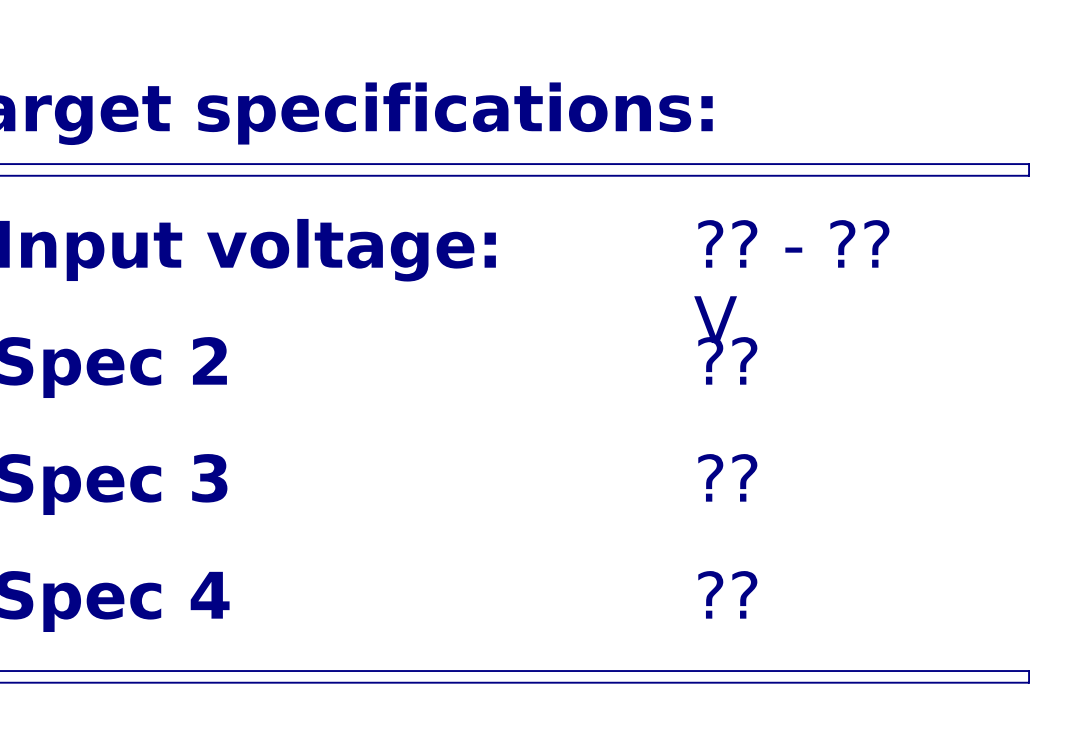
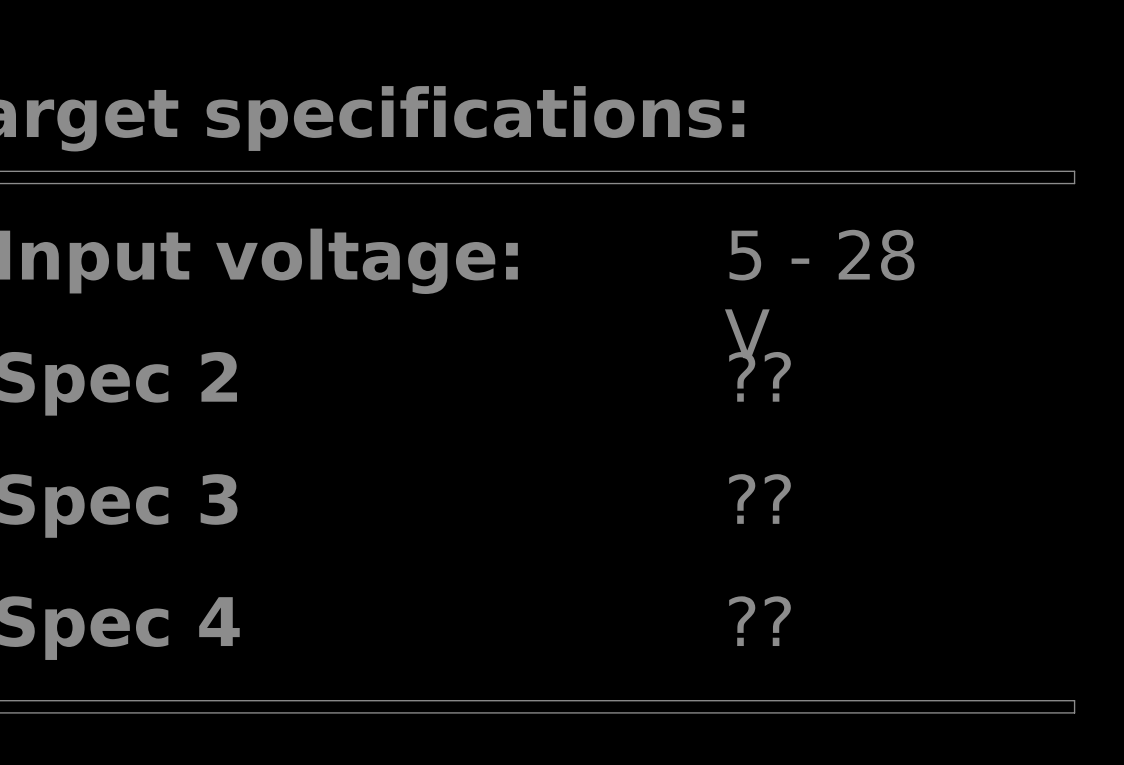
text: ?? - ?? (793, 243) -> 5 - 28 (822, 255)

